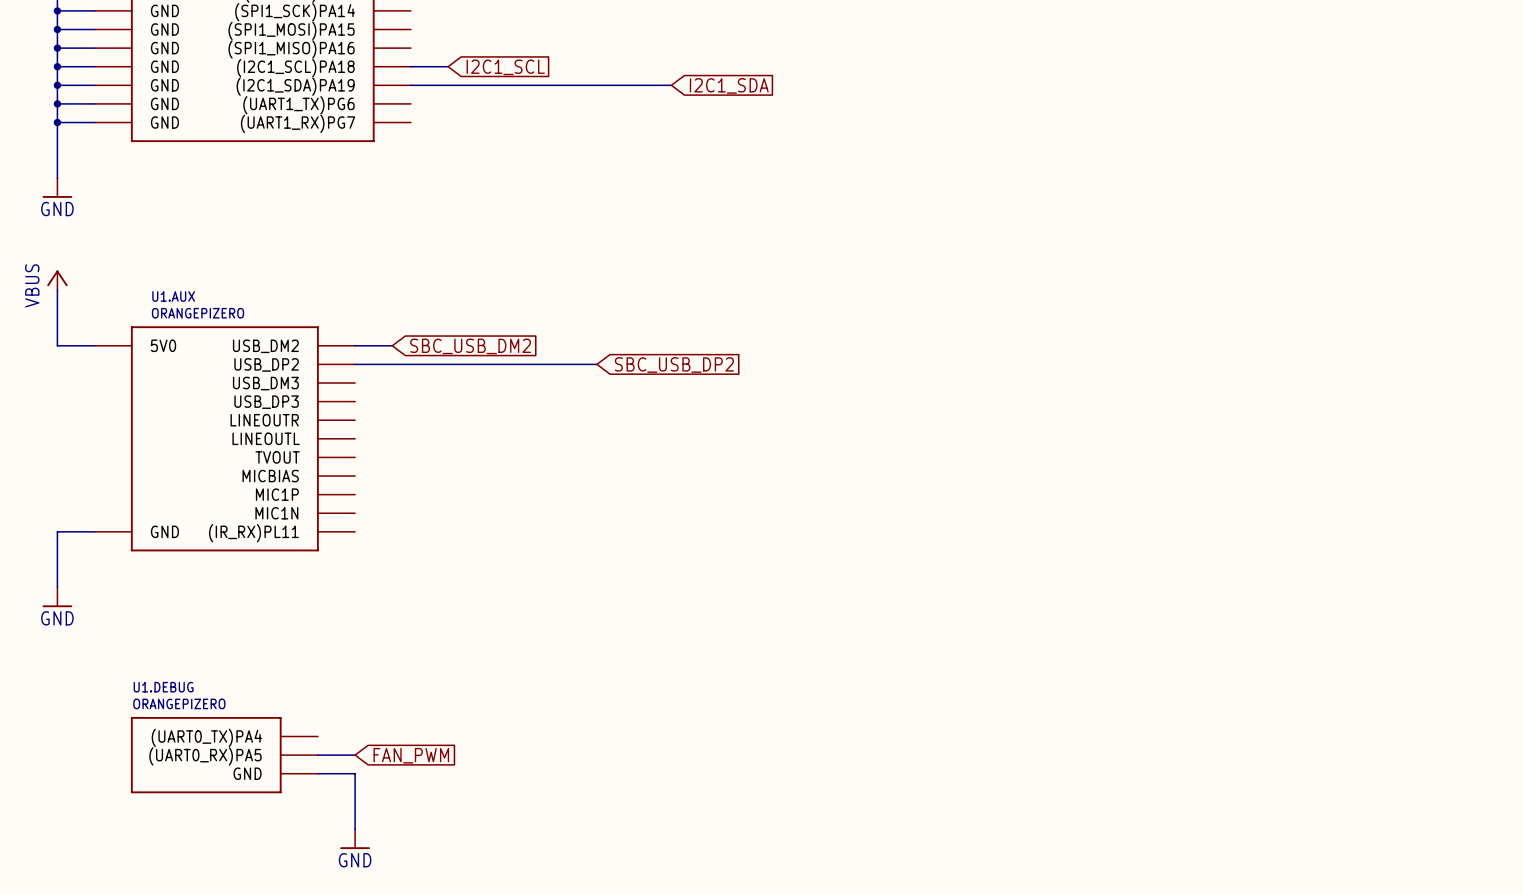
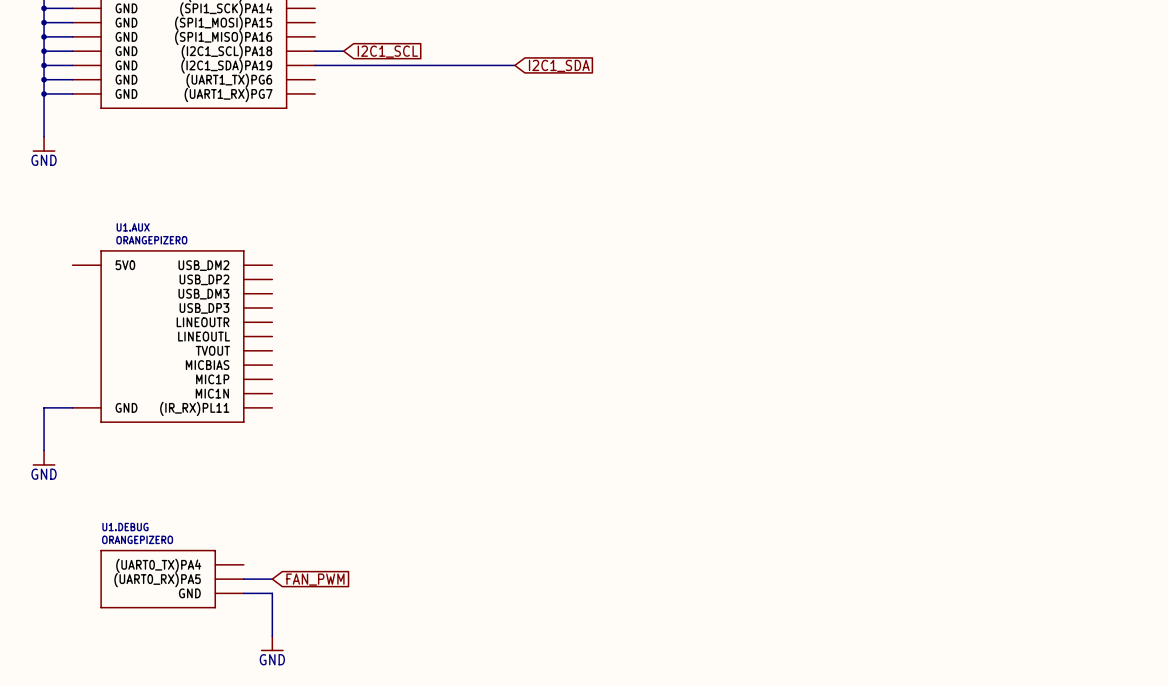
power symbol: VBUS (57, 280) -> none
wire: (57, 289) (57, 345) (94, 345) -> none
wire: (355, 345) (392, 345) -> none
global label: SBC_USB_DM2 (470, 346) -> none
wire: (355, 364) (596, 364) -> none
global label: SBC_USB_DP2 (674, 365) -> none

